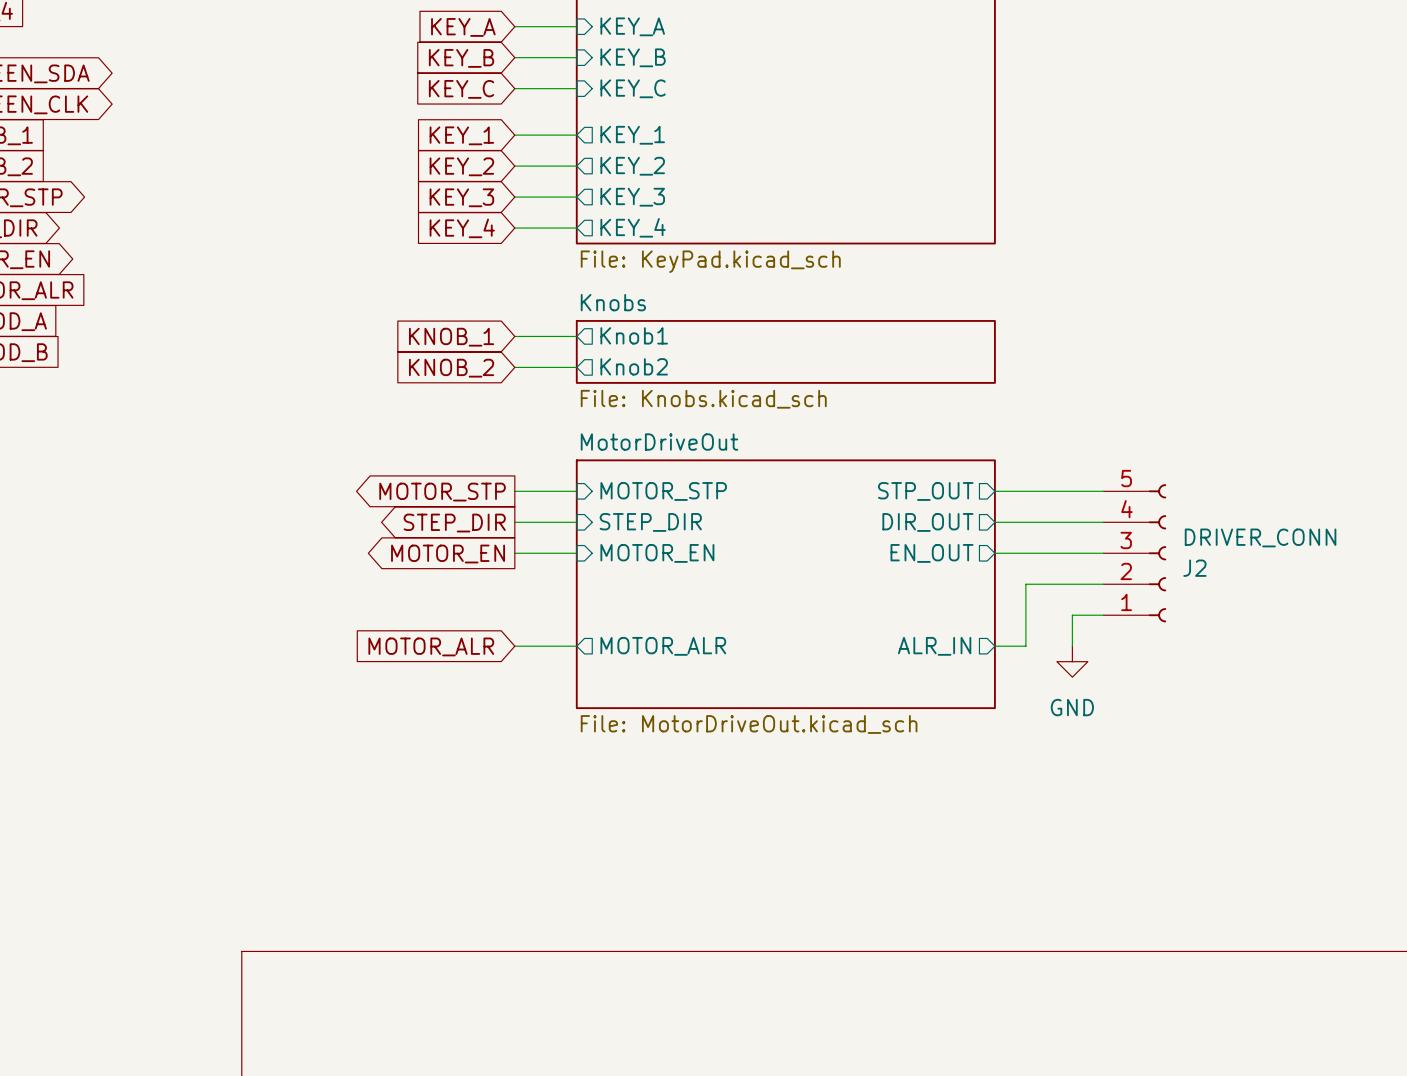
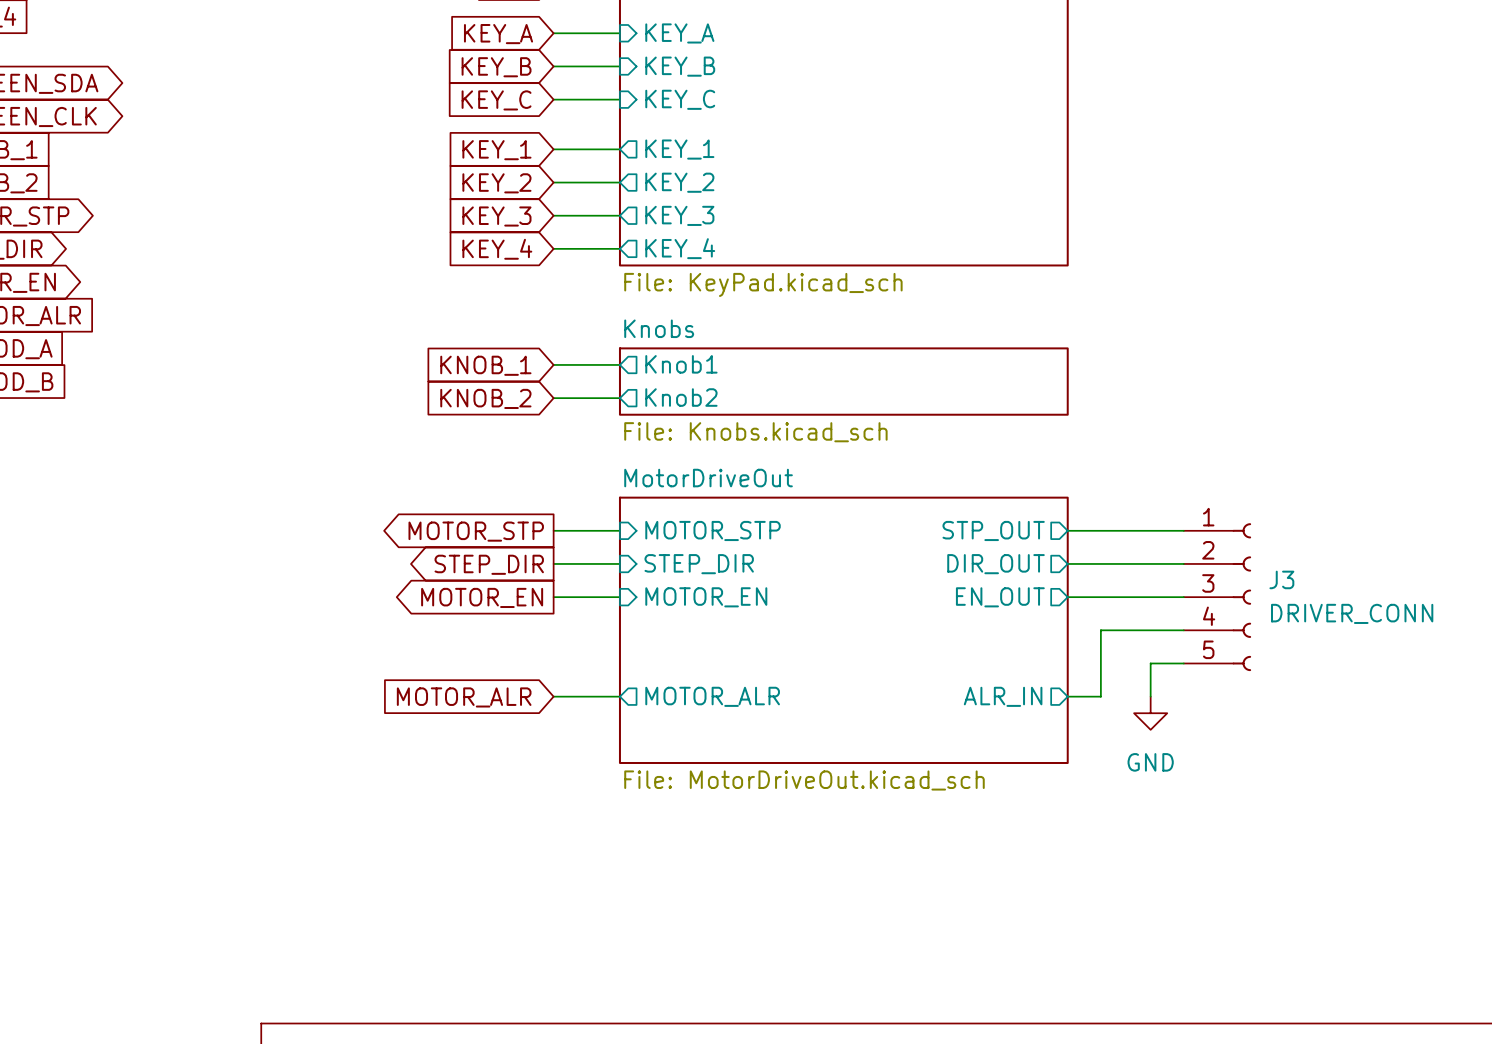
J2 flip: as is (1157, 553) -> up-down (1241, 597)
J2 name: J2 (1194, 568) -> J3 (1281, 579)

